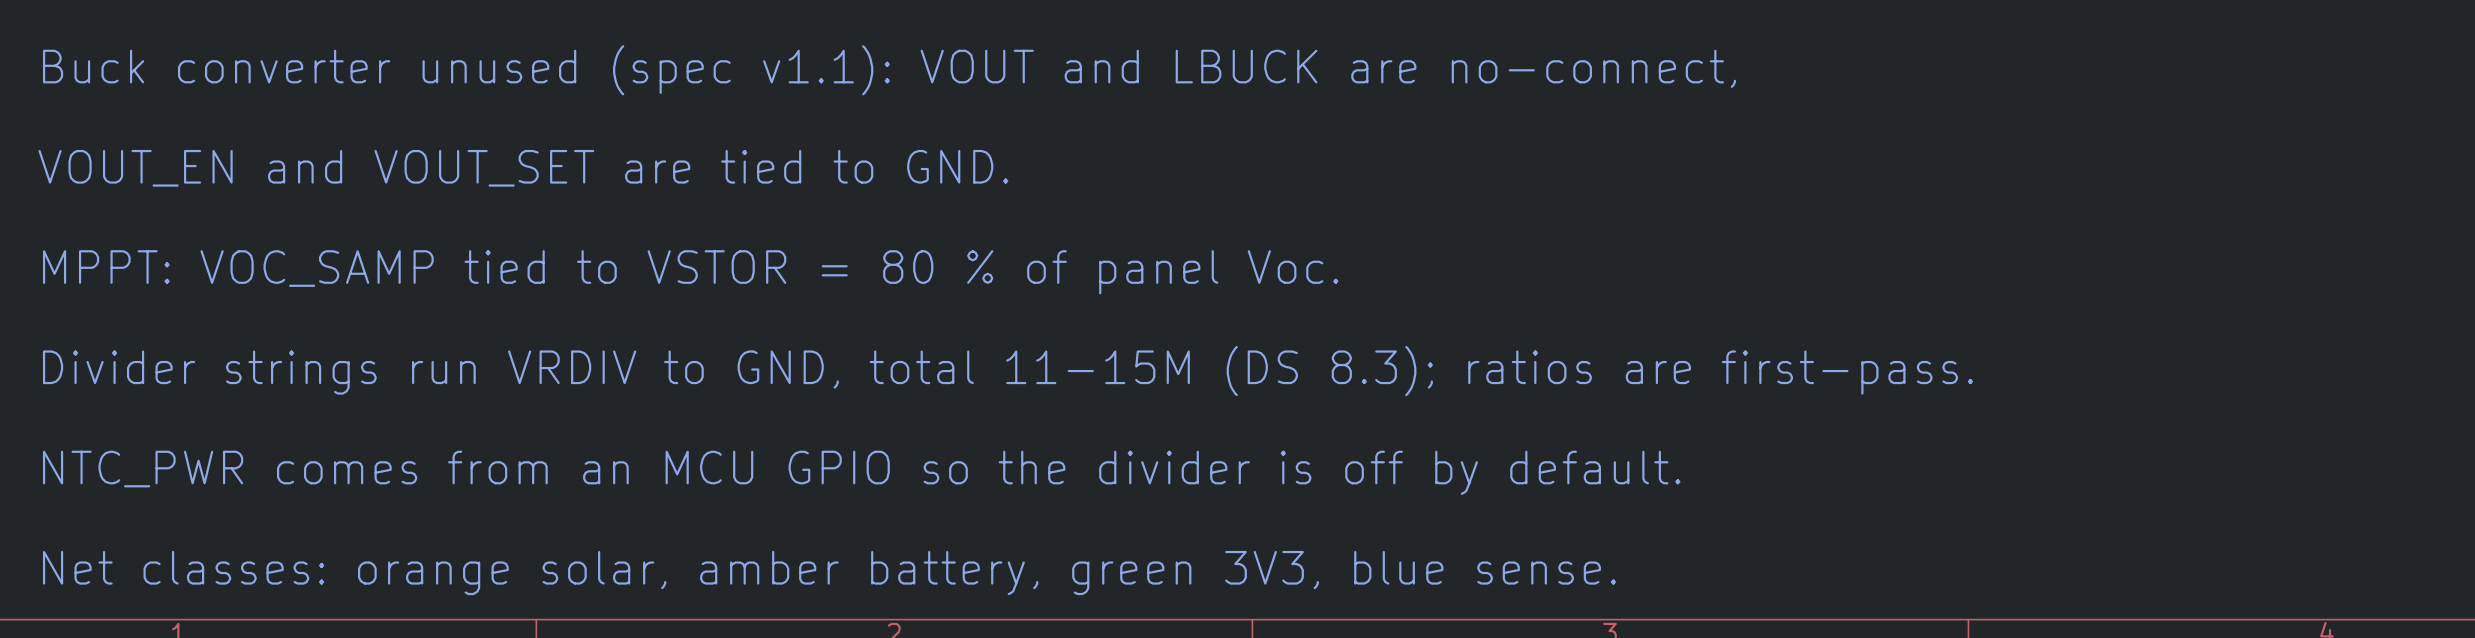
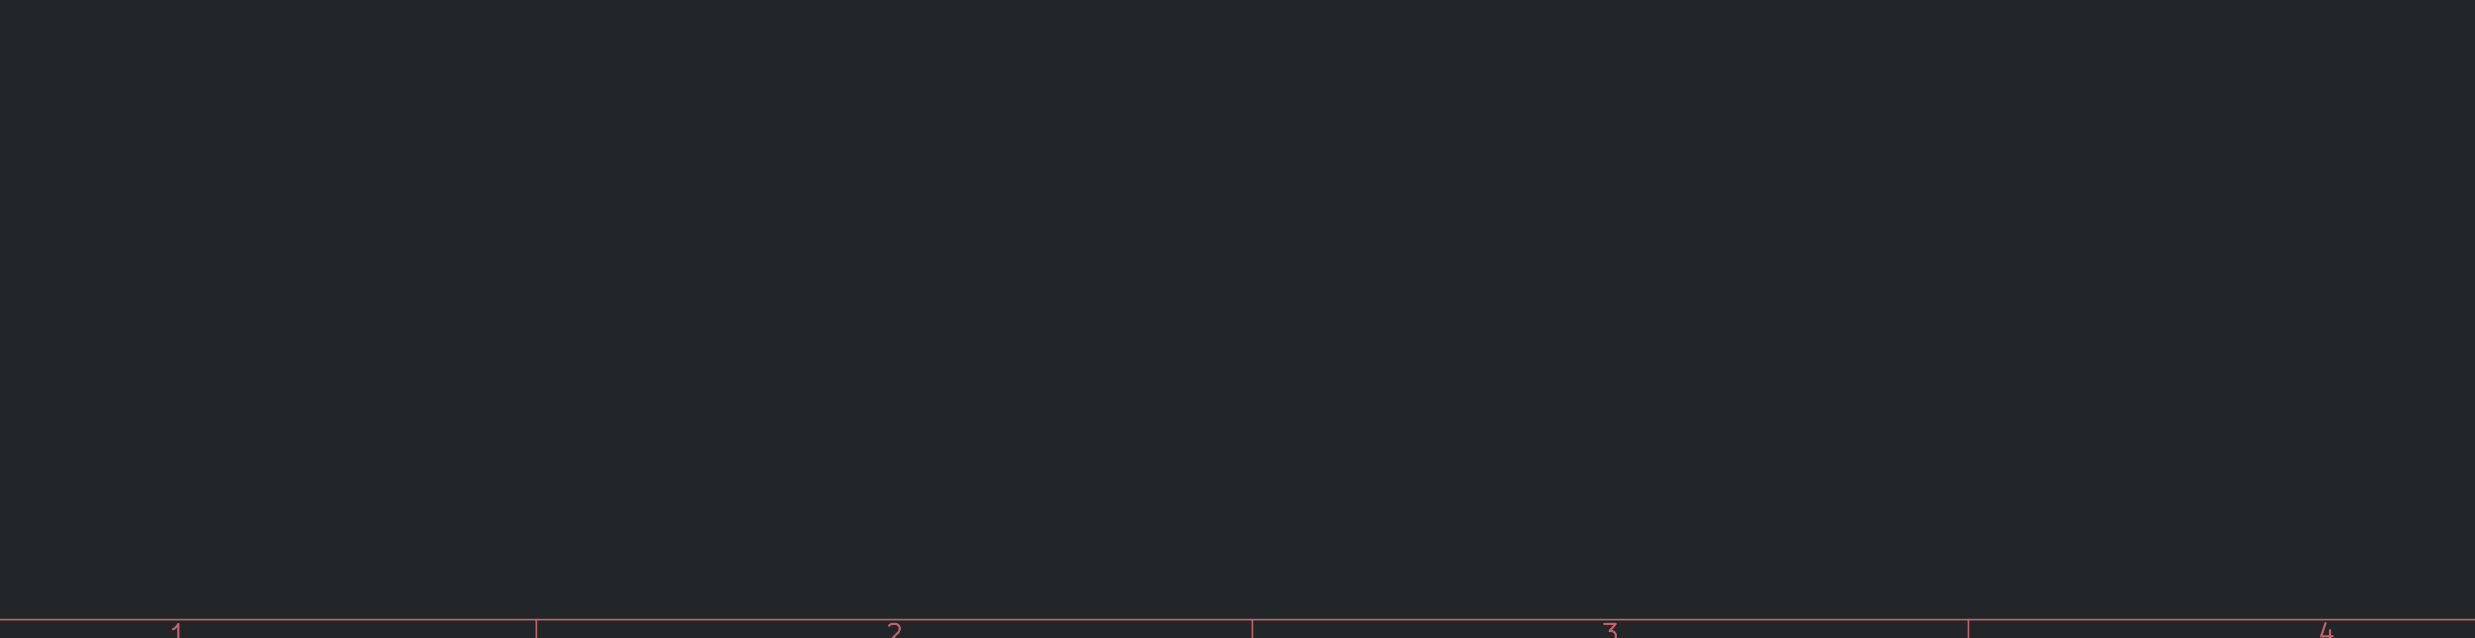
text: Buck converter unused (spec v1.1): VOUT and LBUCK are no-connect, (889, 70) -> none
text: VOUT_EN and VOUT_SET are tied to GND. (523, 168) -> none
text: MPPT: VOC_SAMP tied to VSTOR = 80 % of panel Voc. (690, 272) -> none
text: Divider strings run VRDIV to GND, total 11-15M (DS 8.3); ratios are first-pass. (1007, 371) -> none
text: NTC_PWR comes from an MCU GPIO so the divider is off by default. (861, 472) -> none
text: Net classes: orange solar, amber battery, green 3V3, blue sense. (829, 573) -> none

